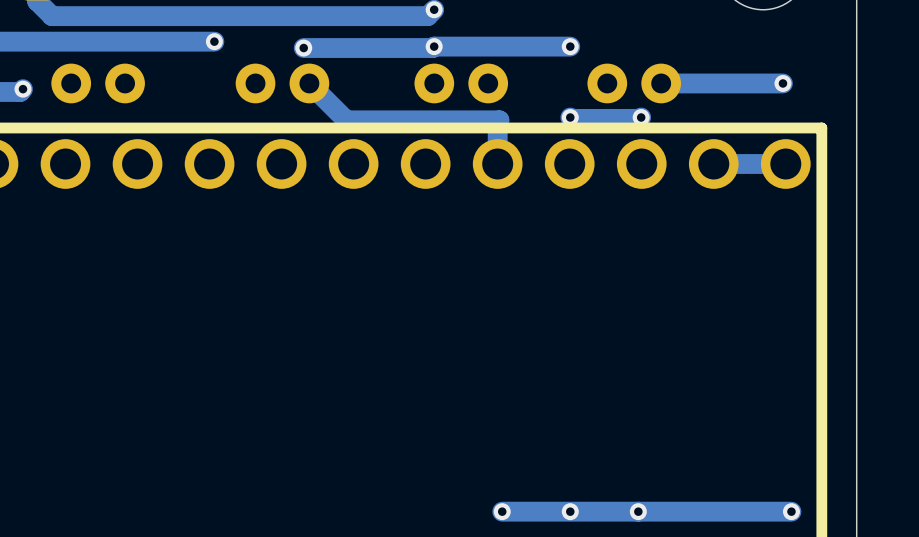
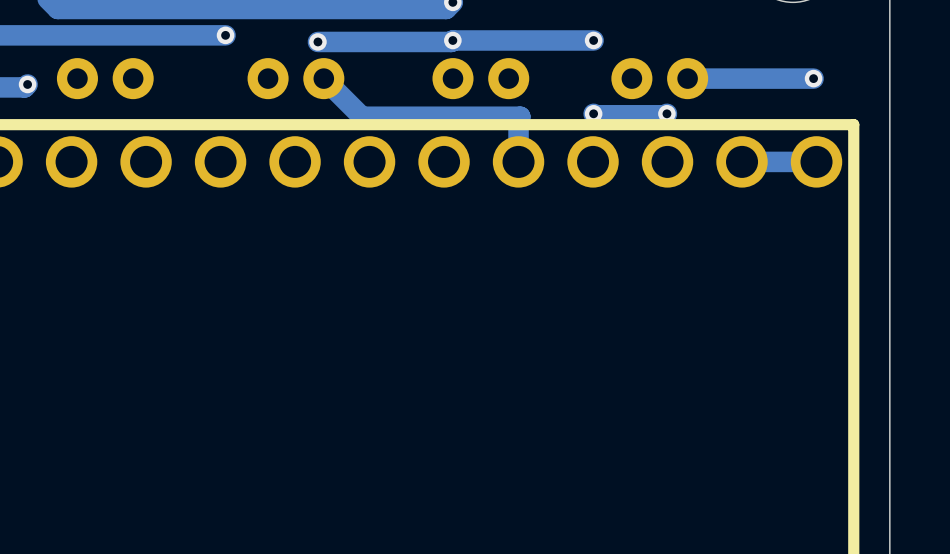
via: (502, 511) -> none
via: (570, 511) -> none
via: (638, 511) -> none
track: (791, 511) (502, 511) -> none
via: (791, 511) -> none

